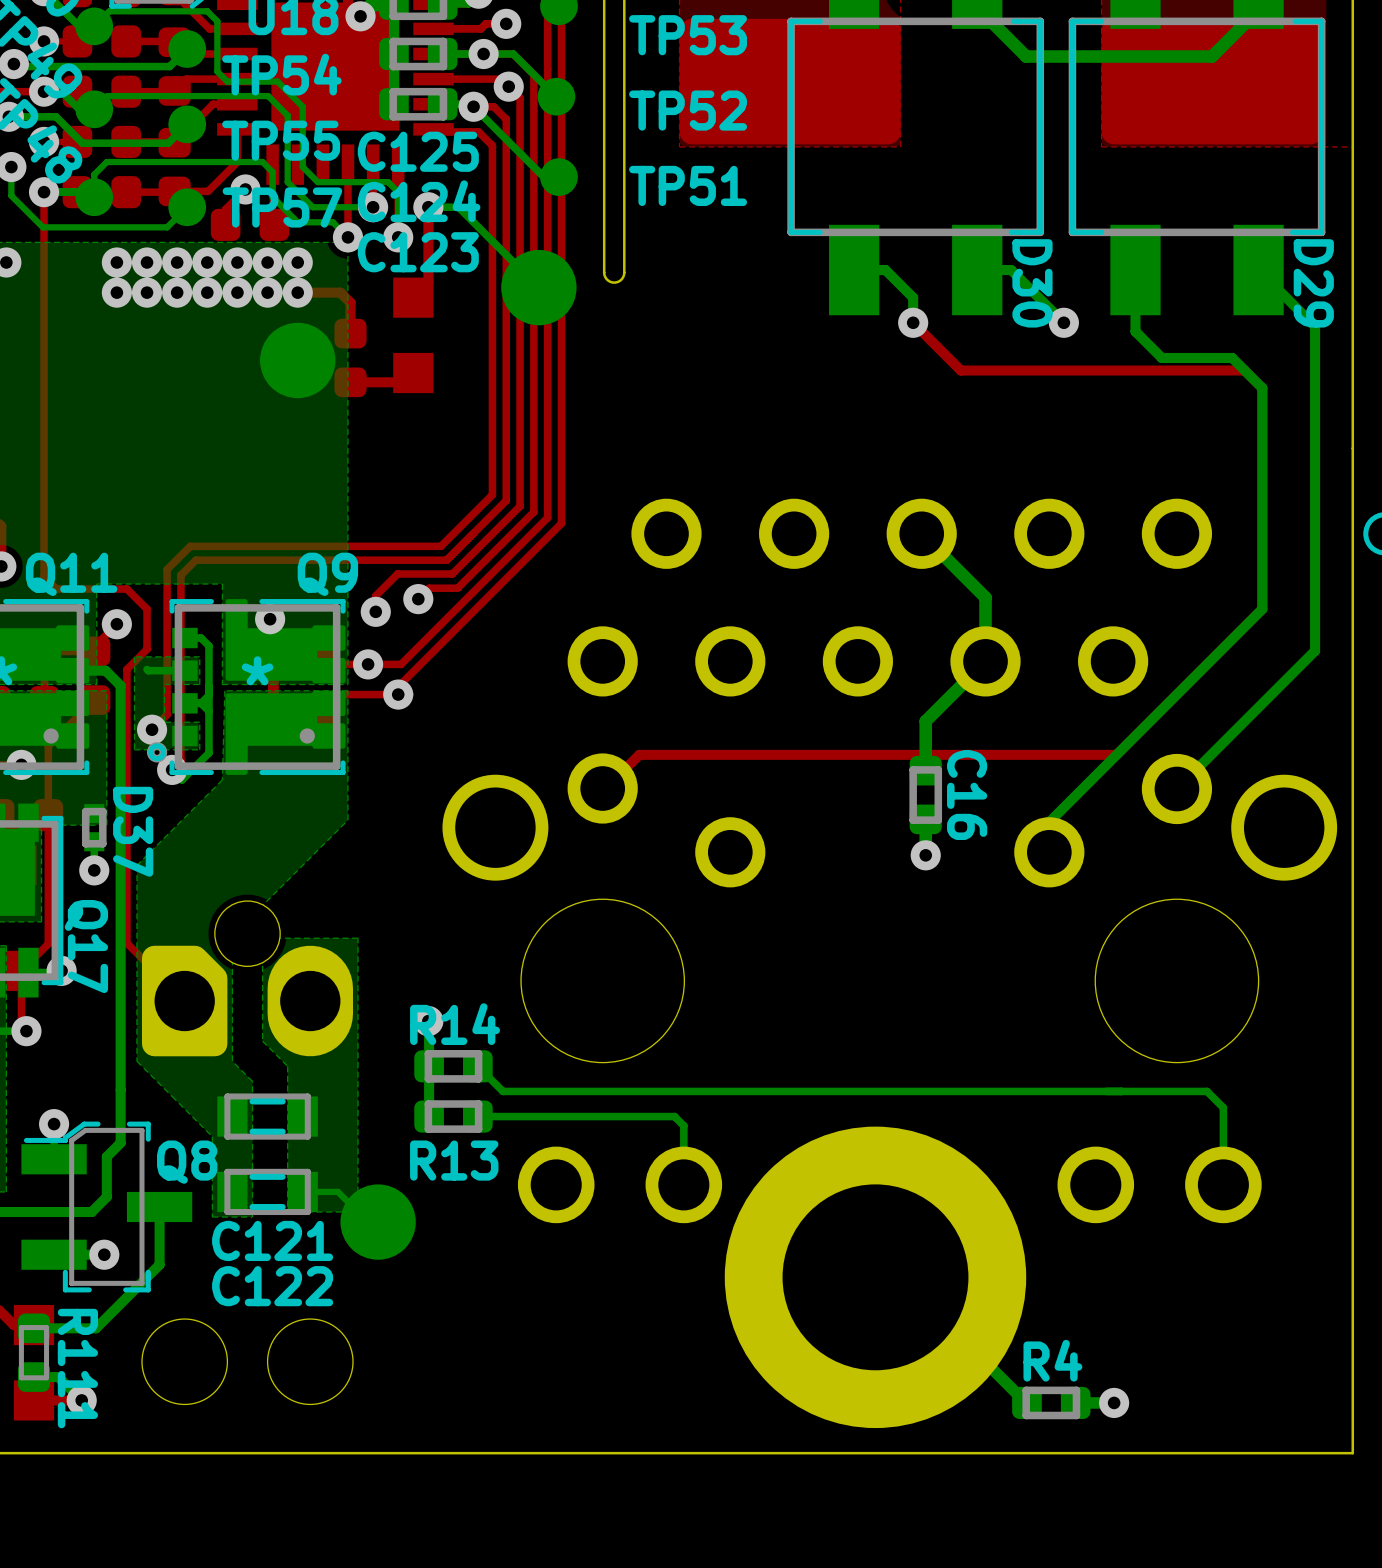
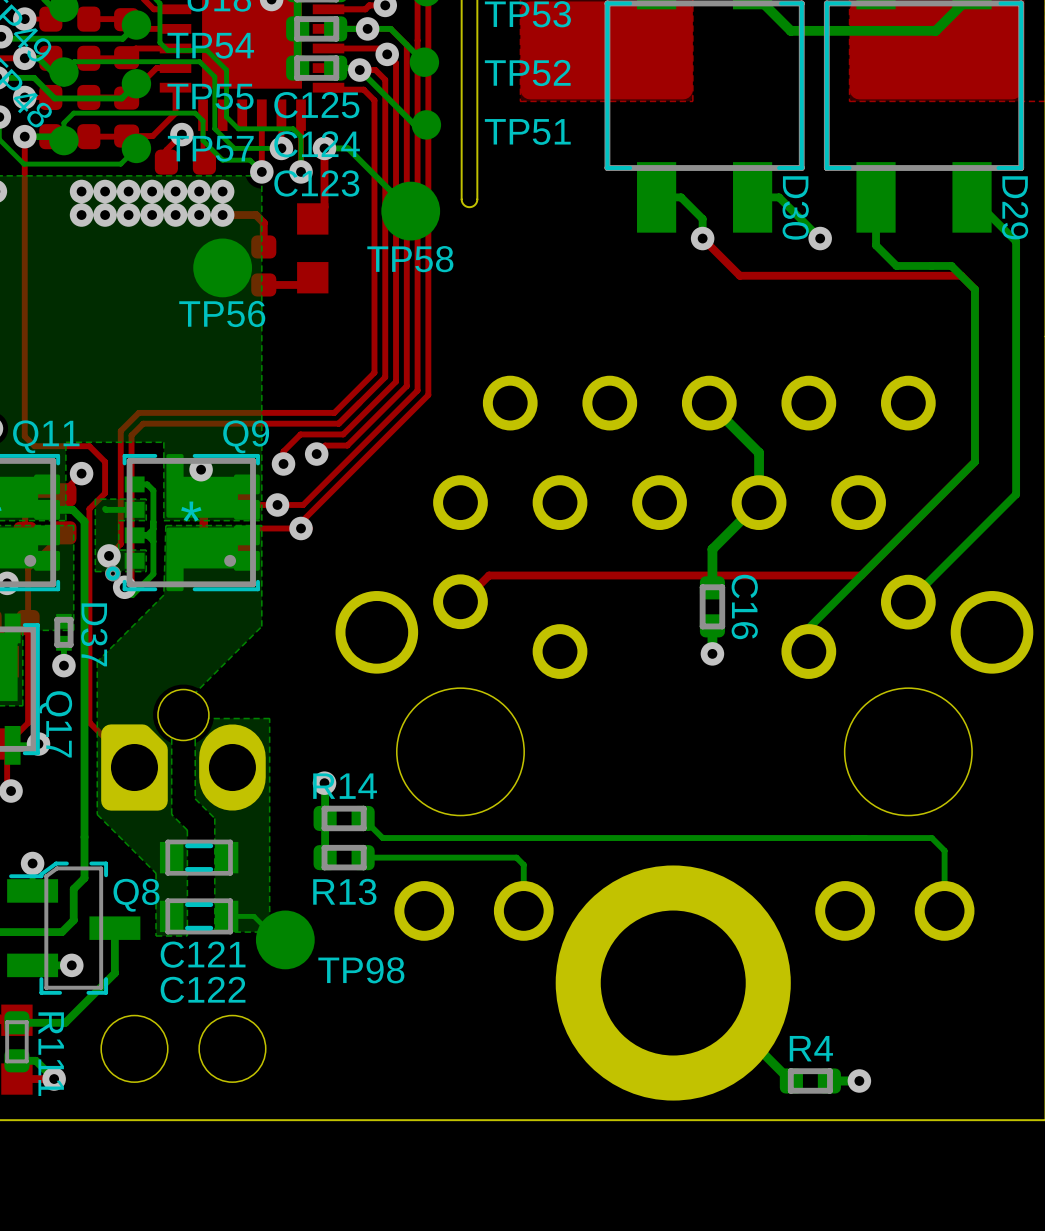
TP58 name: none -> TP58 (410, 259)
TP56 name: none -> TP56 (222, 313)
TP98 name: none -> TP98 (361, 970)

